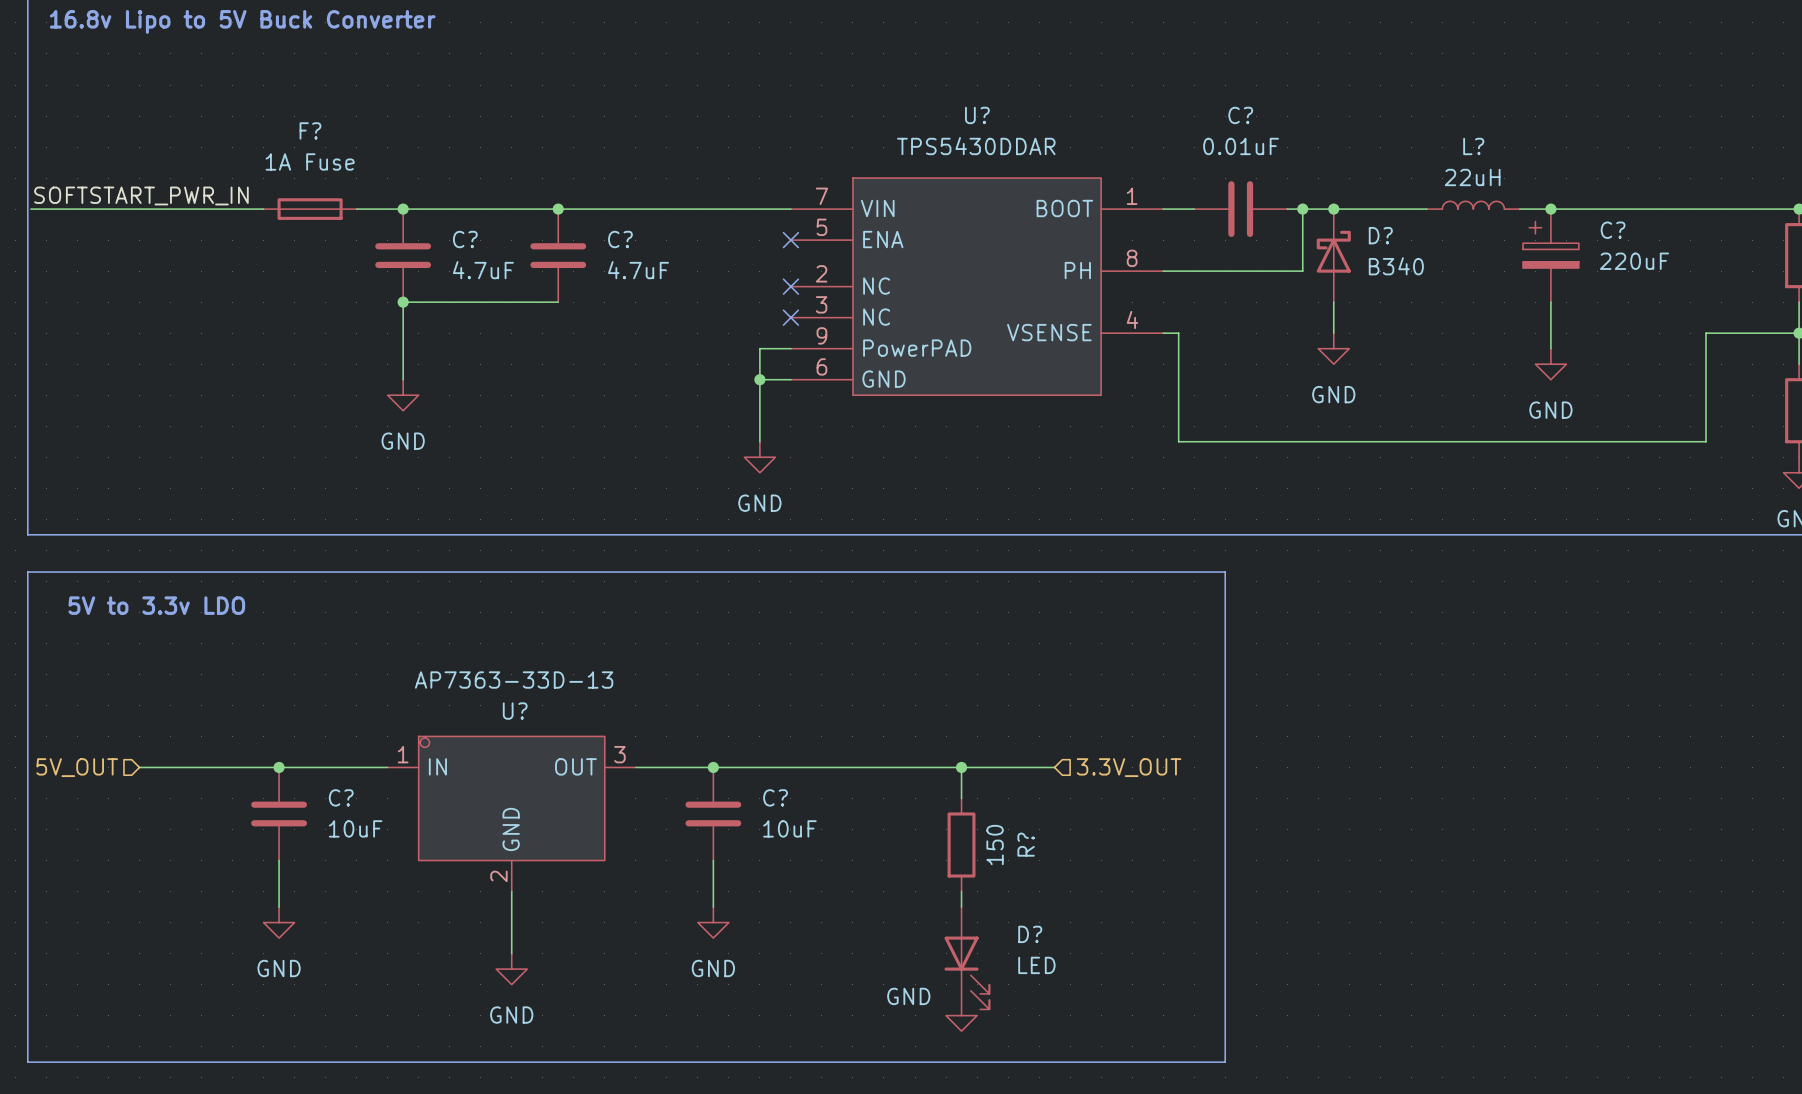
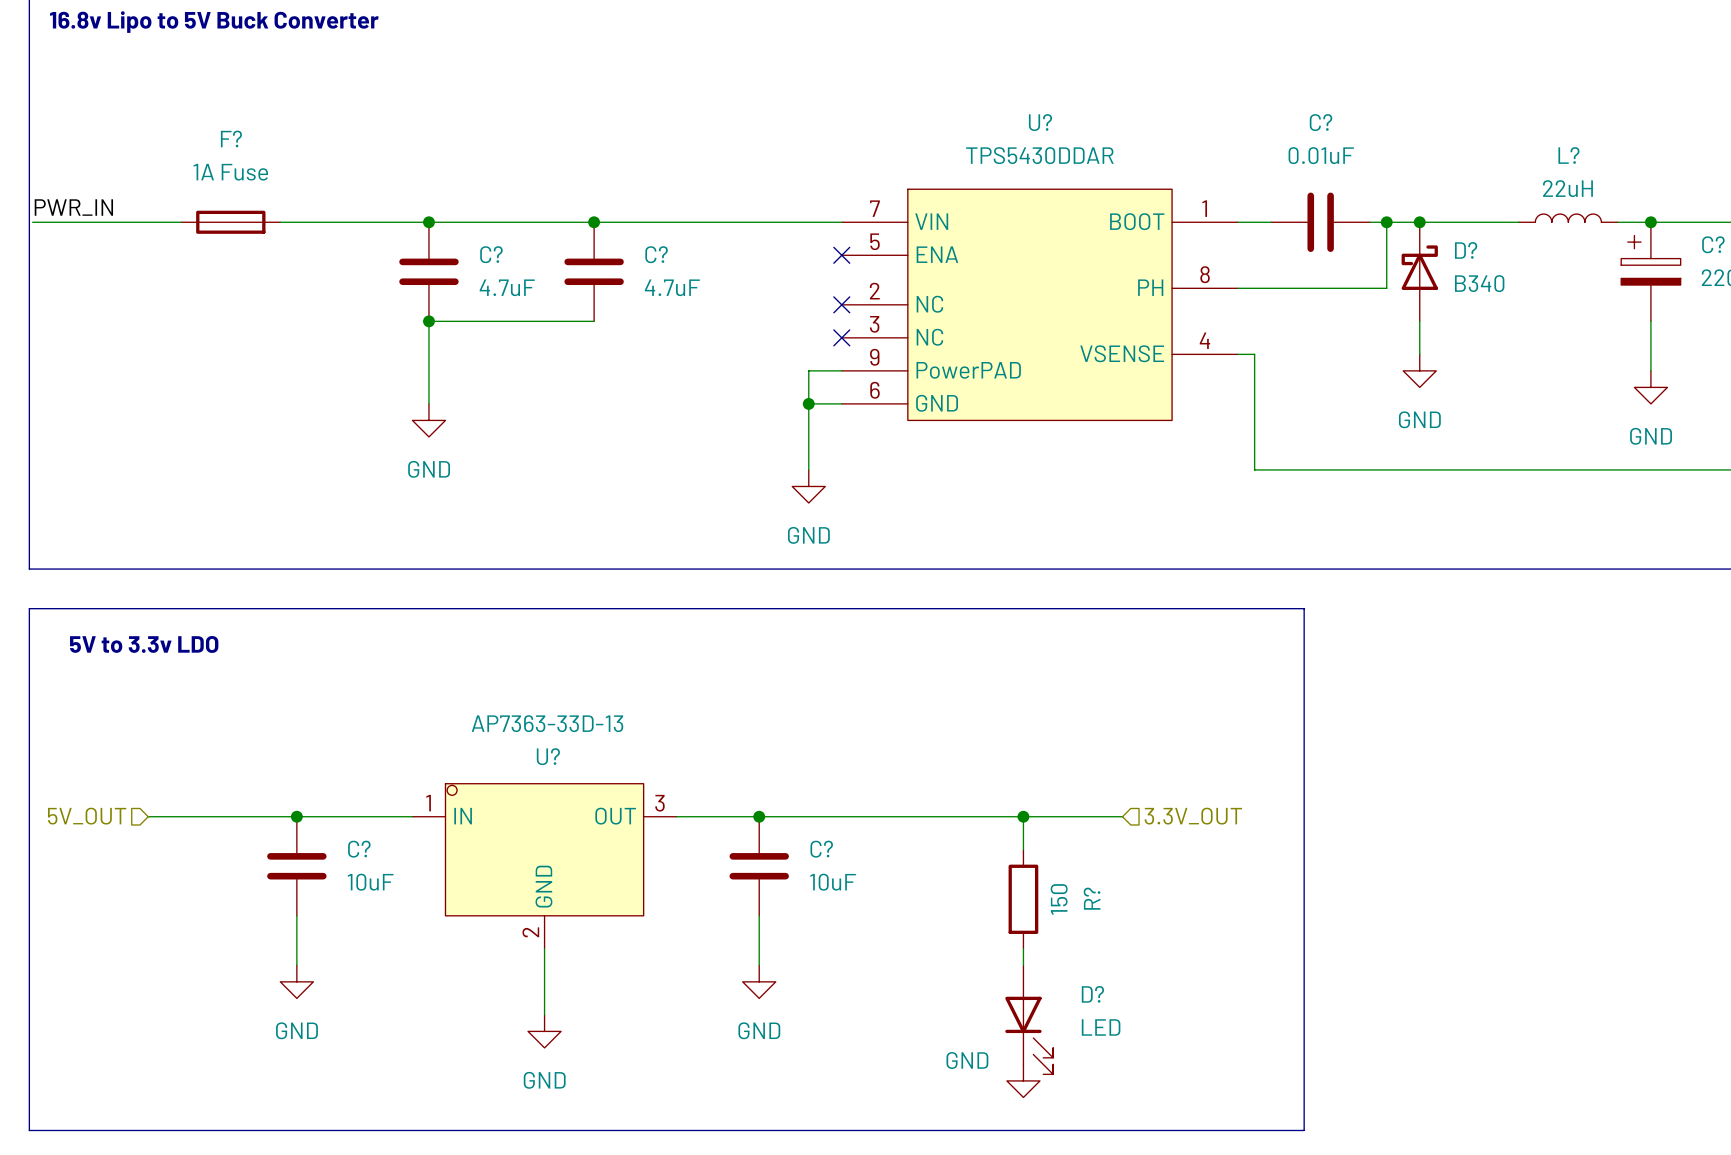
label: SOFTSTART_PWR_IN (141, 195) -> PWR_IN (73, 207)
F? position: (310, 209) -> (230, 222)

